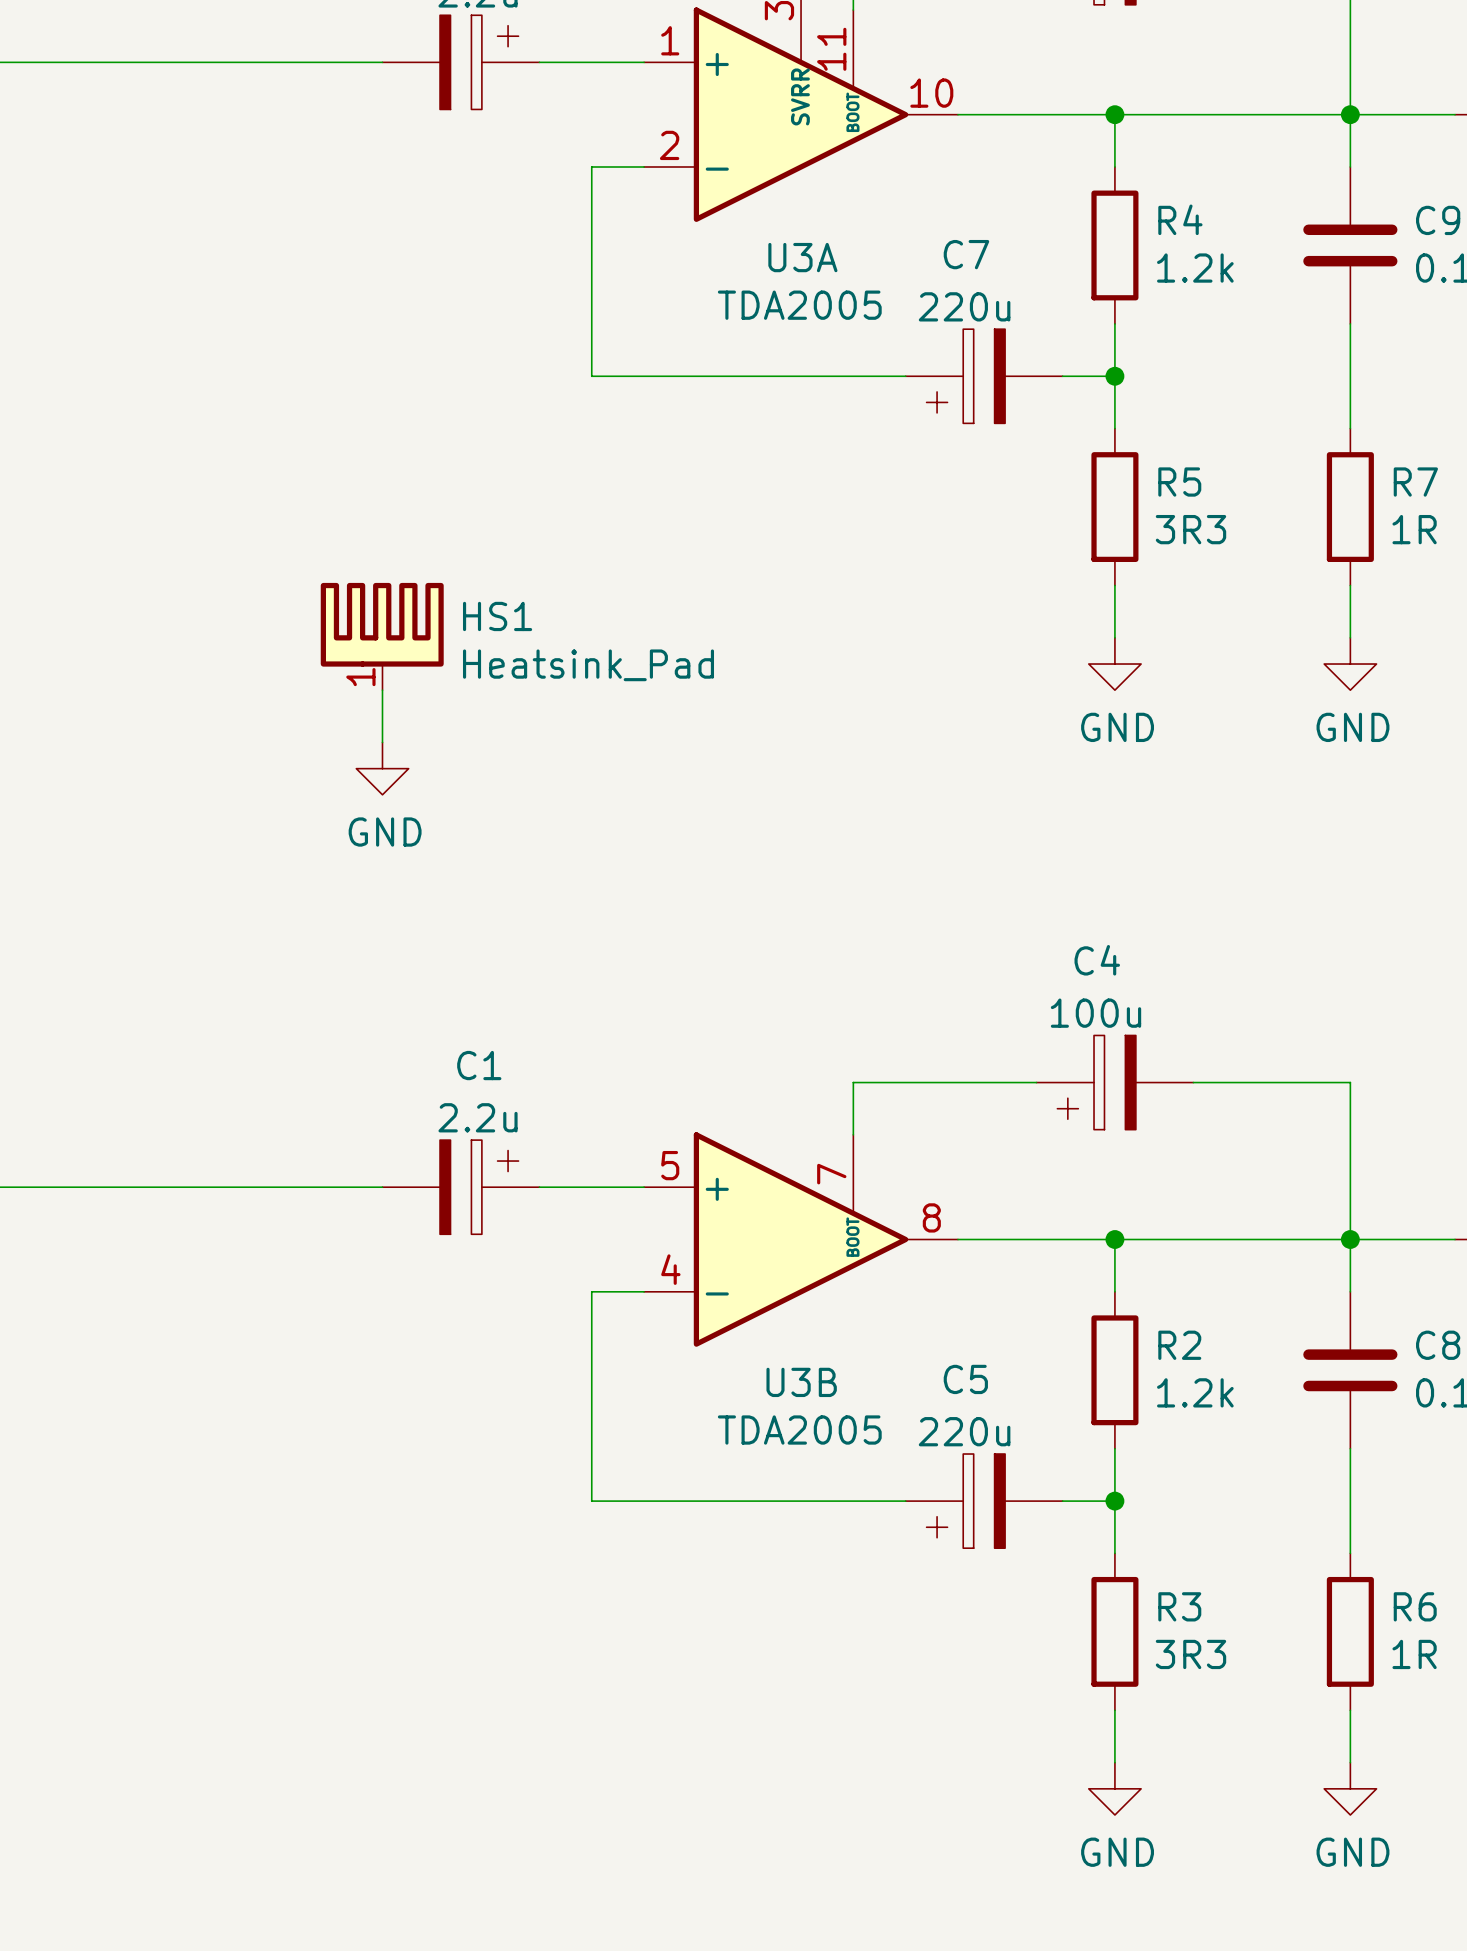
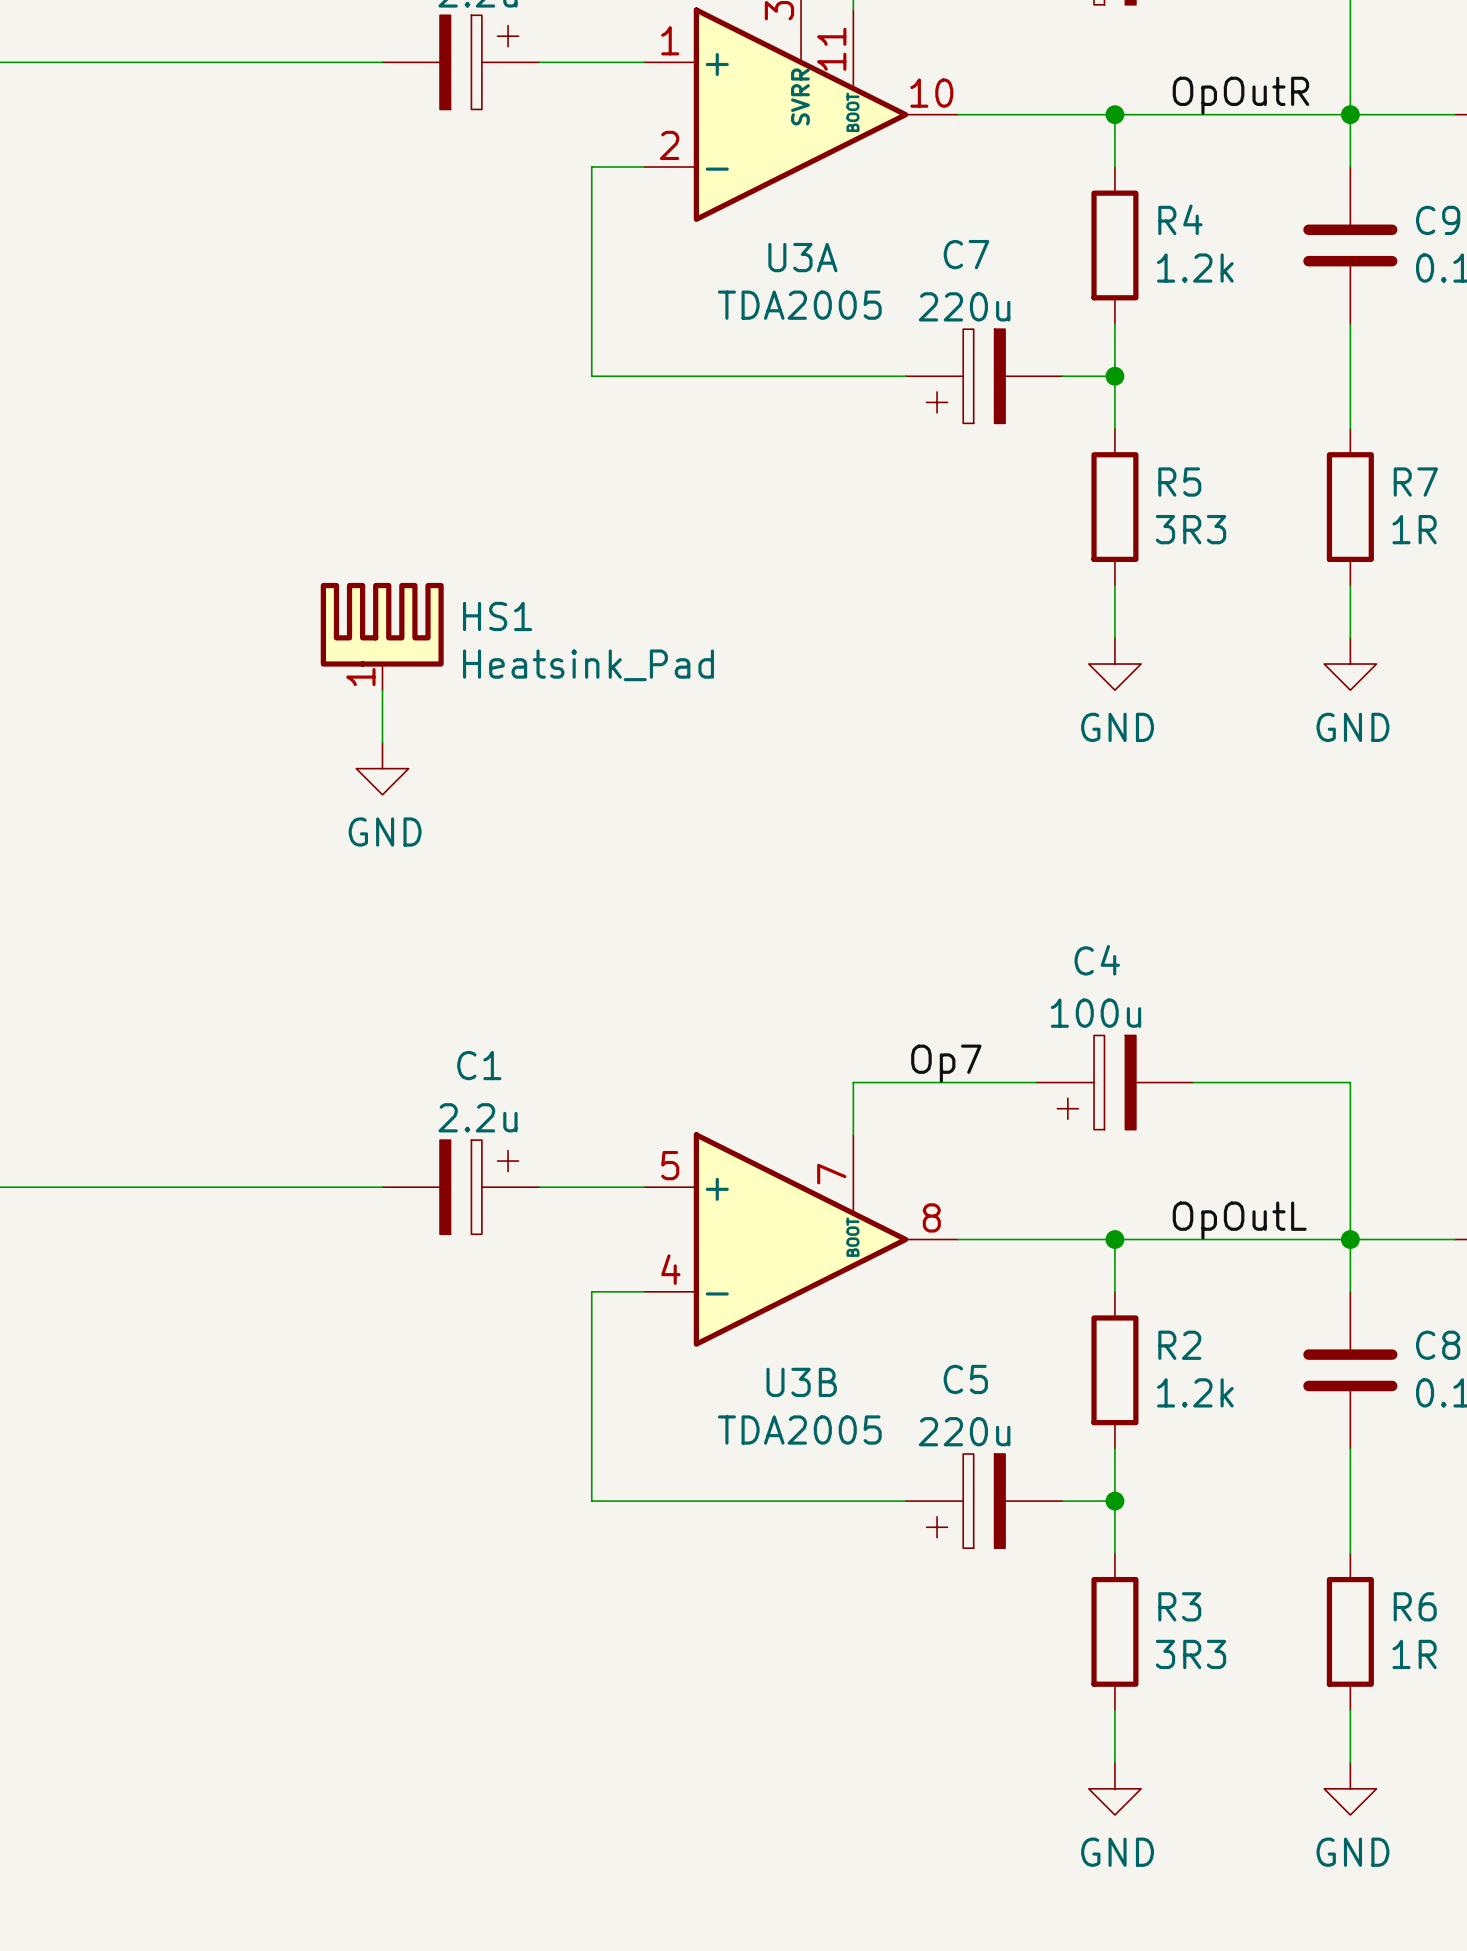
label: none -> OpOutR (1240, 95)
label: none -> Op7 (946, 1063)
label: none -> OpOutL (1239, 1220)

